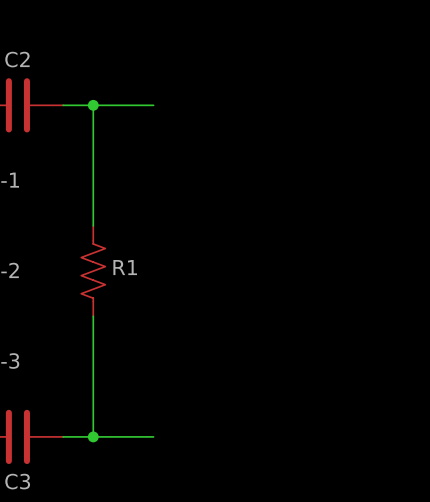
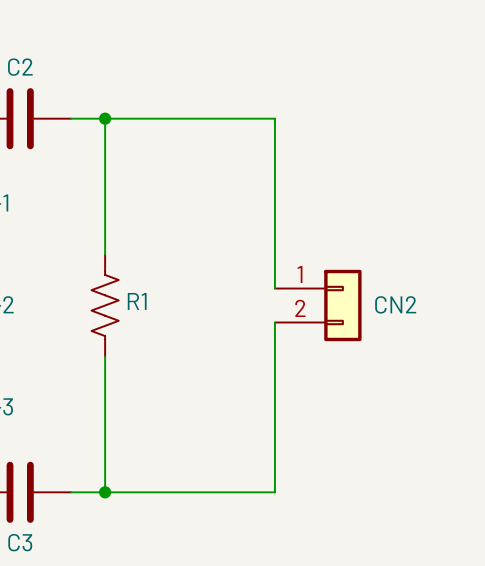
wire: none -> (173, 118) (274, 118) (274, 288)
CN2: none -> (318, 305)
wire: none -> (274, 322) (274, 492) (173, 492)

